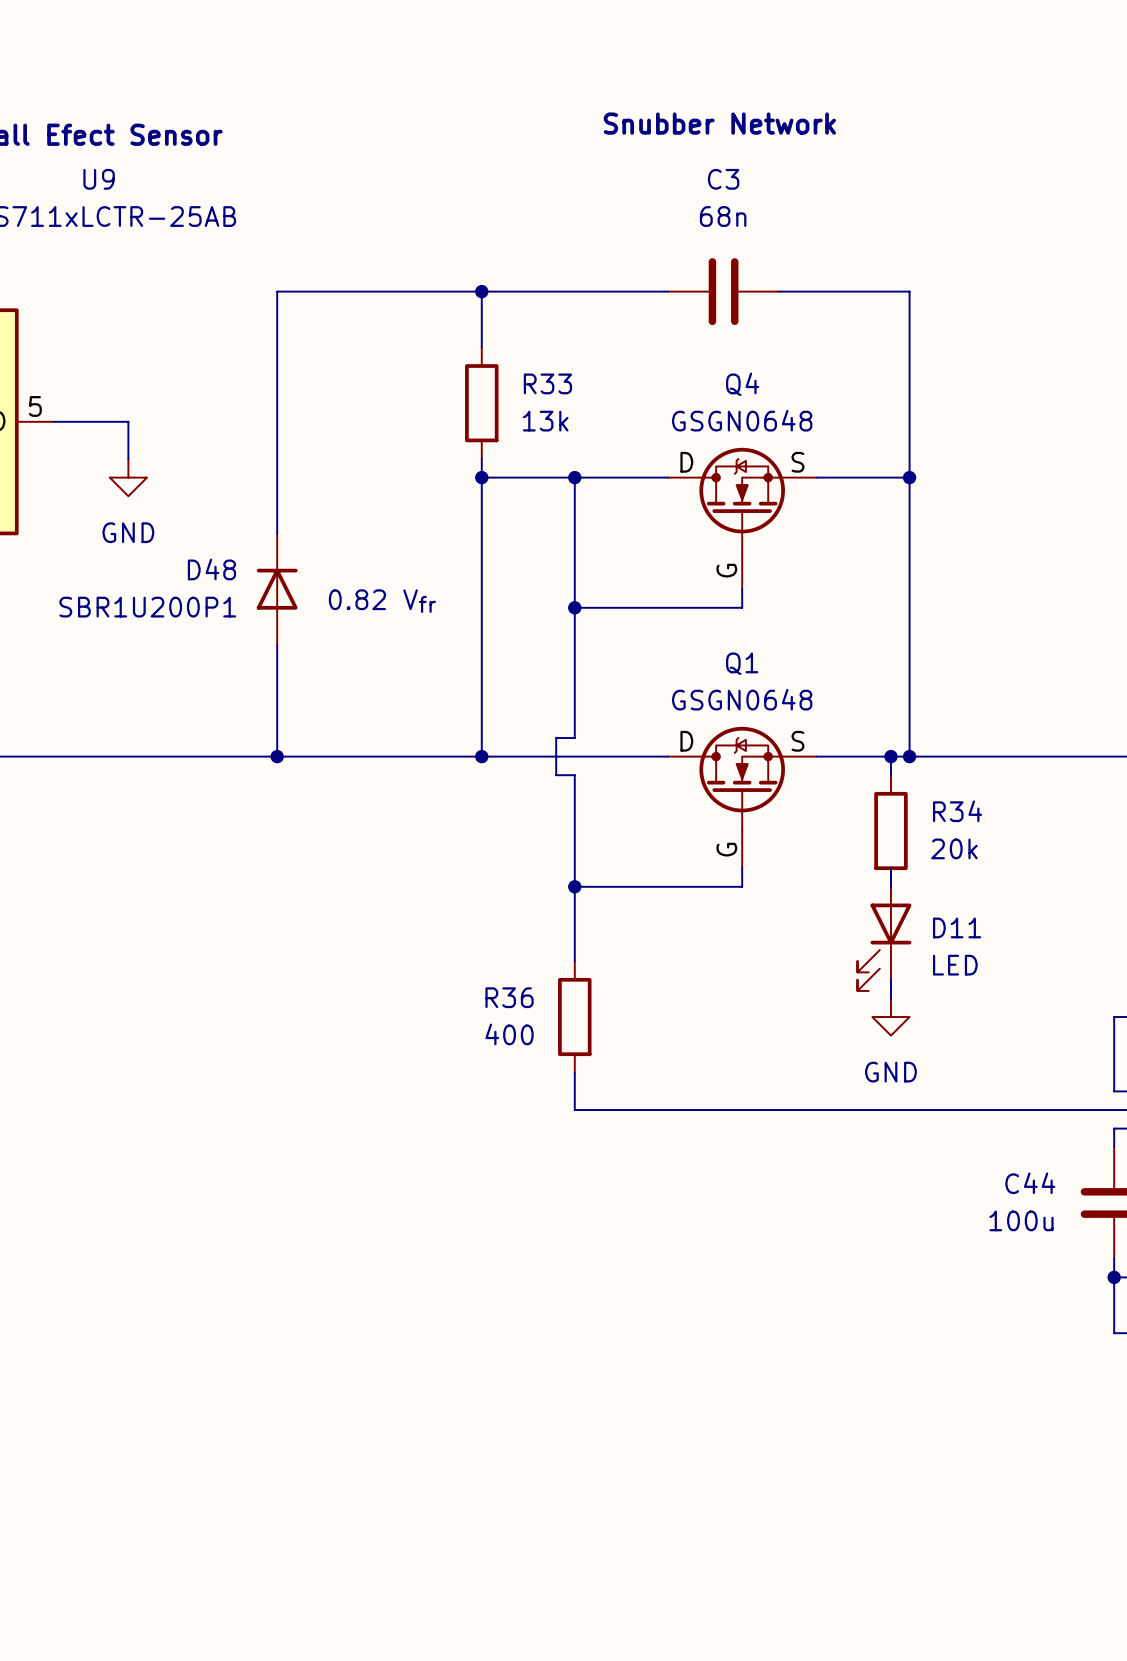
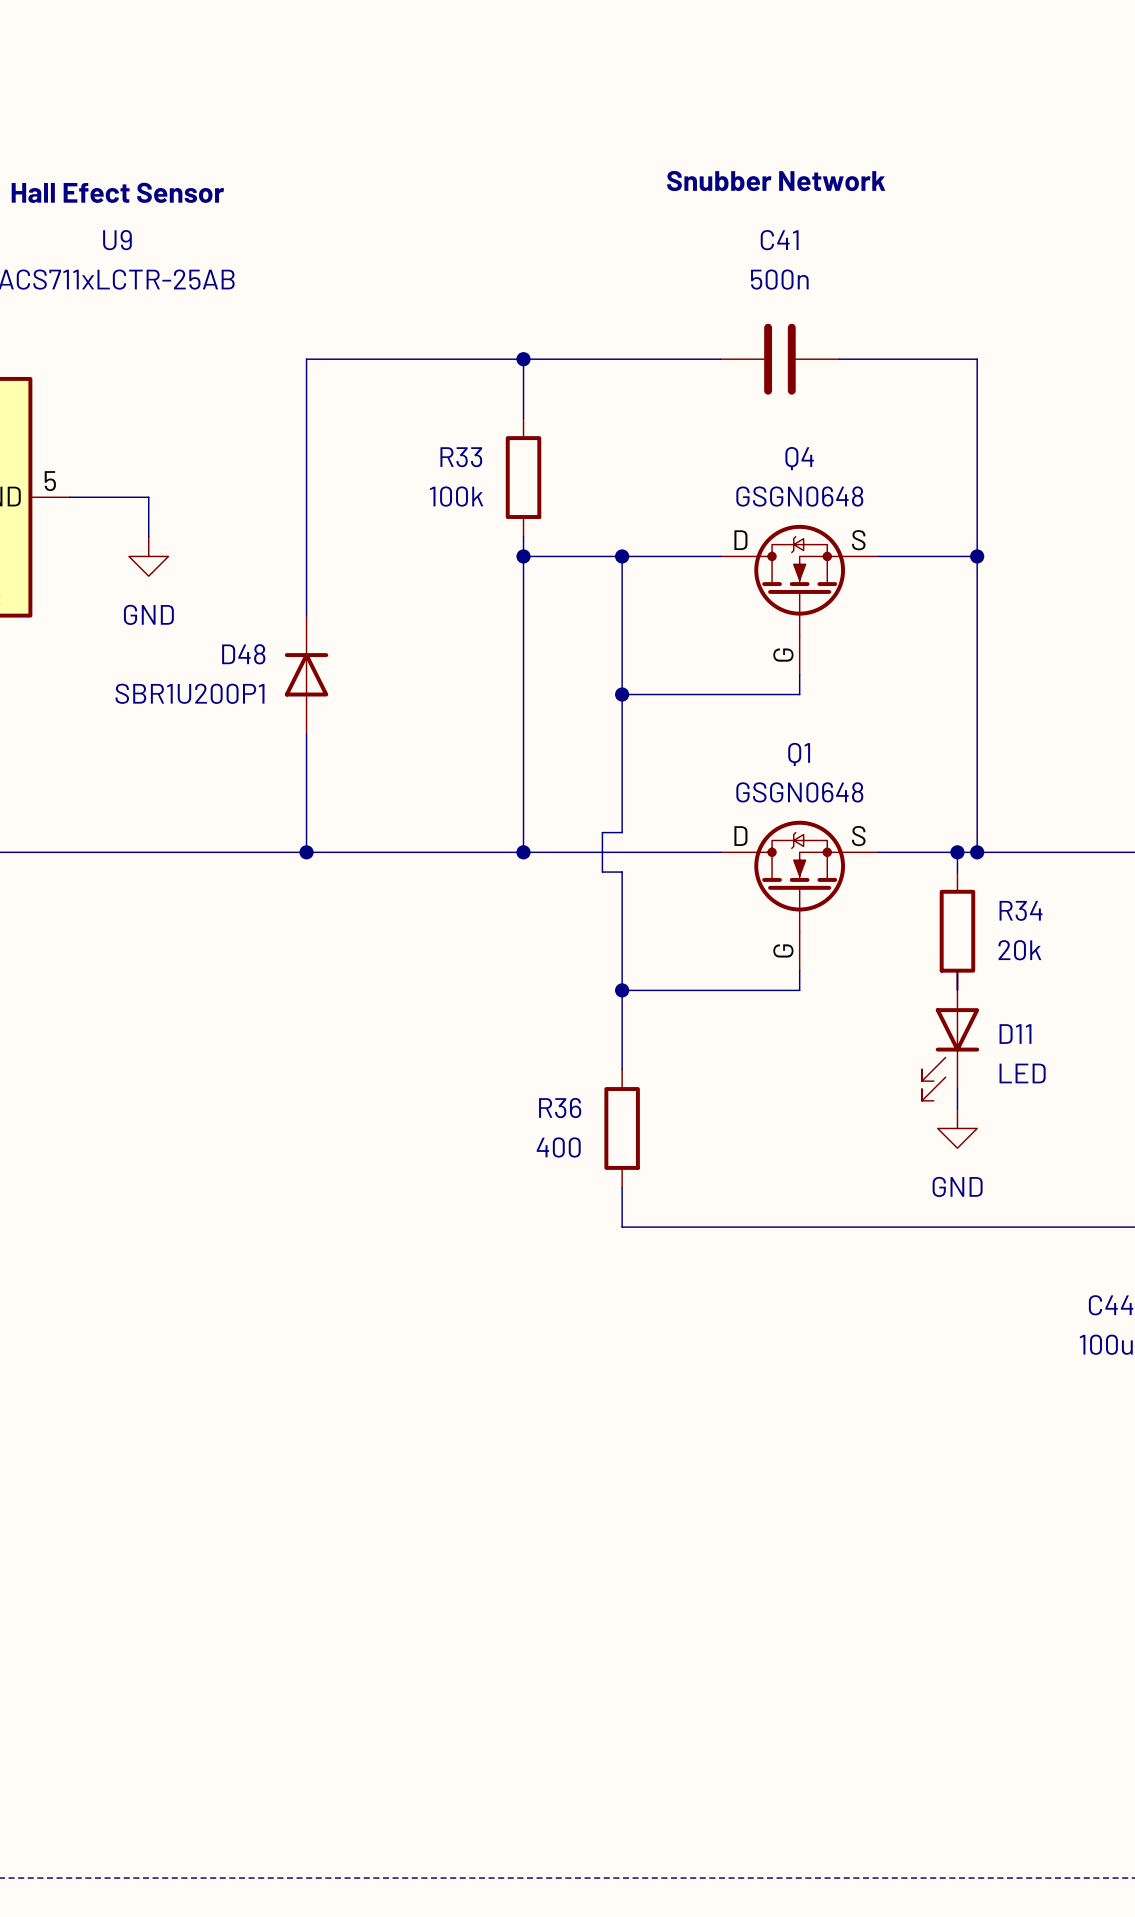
C3 name: C3 (723, 179) -> C41 (779, 240)
C3 value: 68n (723, 216) -> 500n (779, 279)
R33 name position: R33 (547, 383) -> R33 (461, 457)
R33 value: 13k (545, 421) -> 100k (456, 496)
text: 0.82 Vfr (382, 601) -> none

